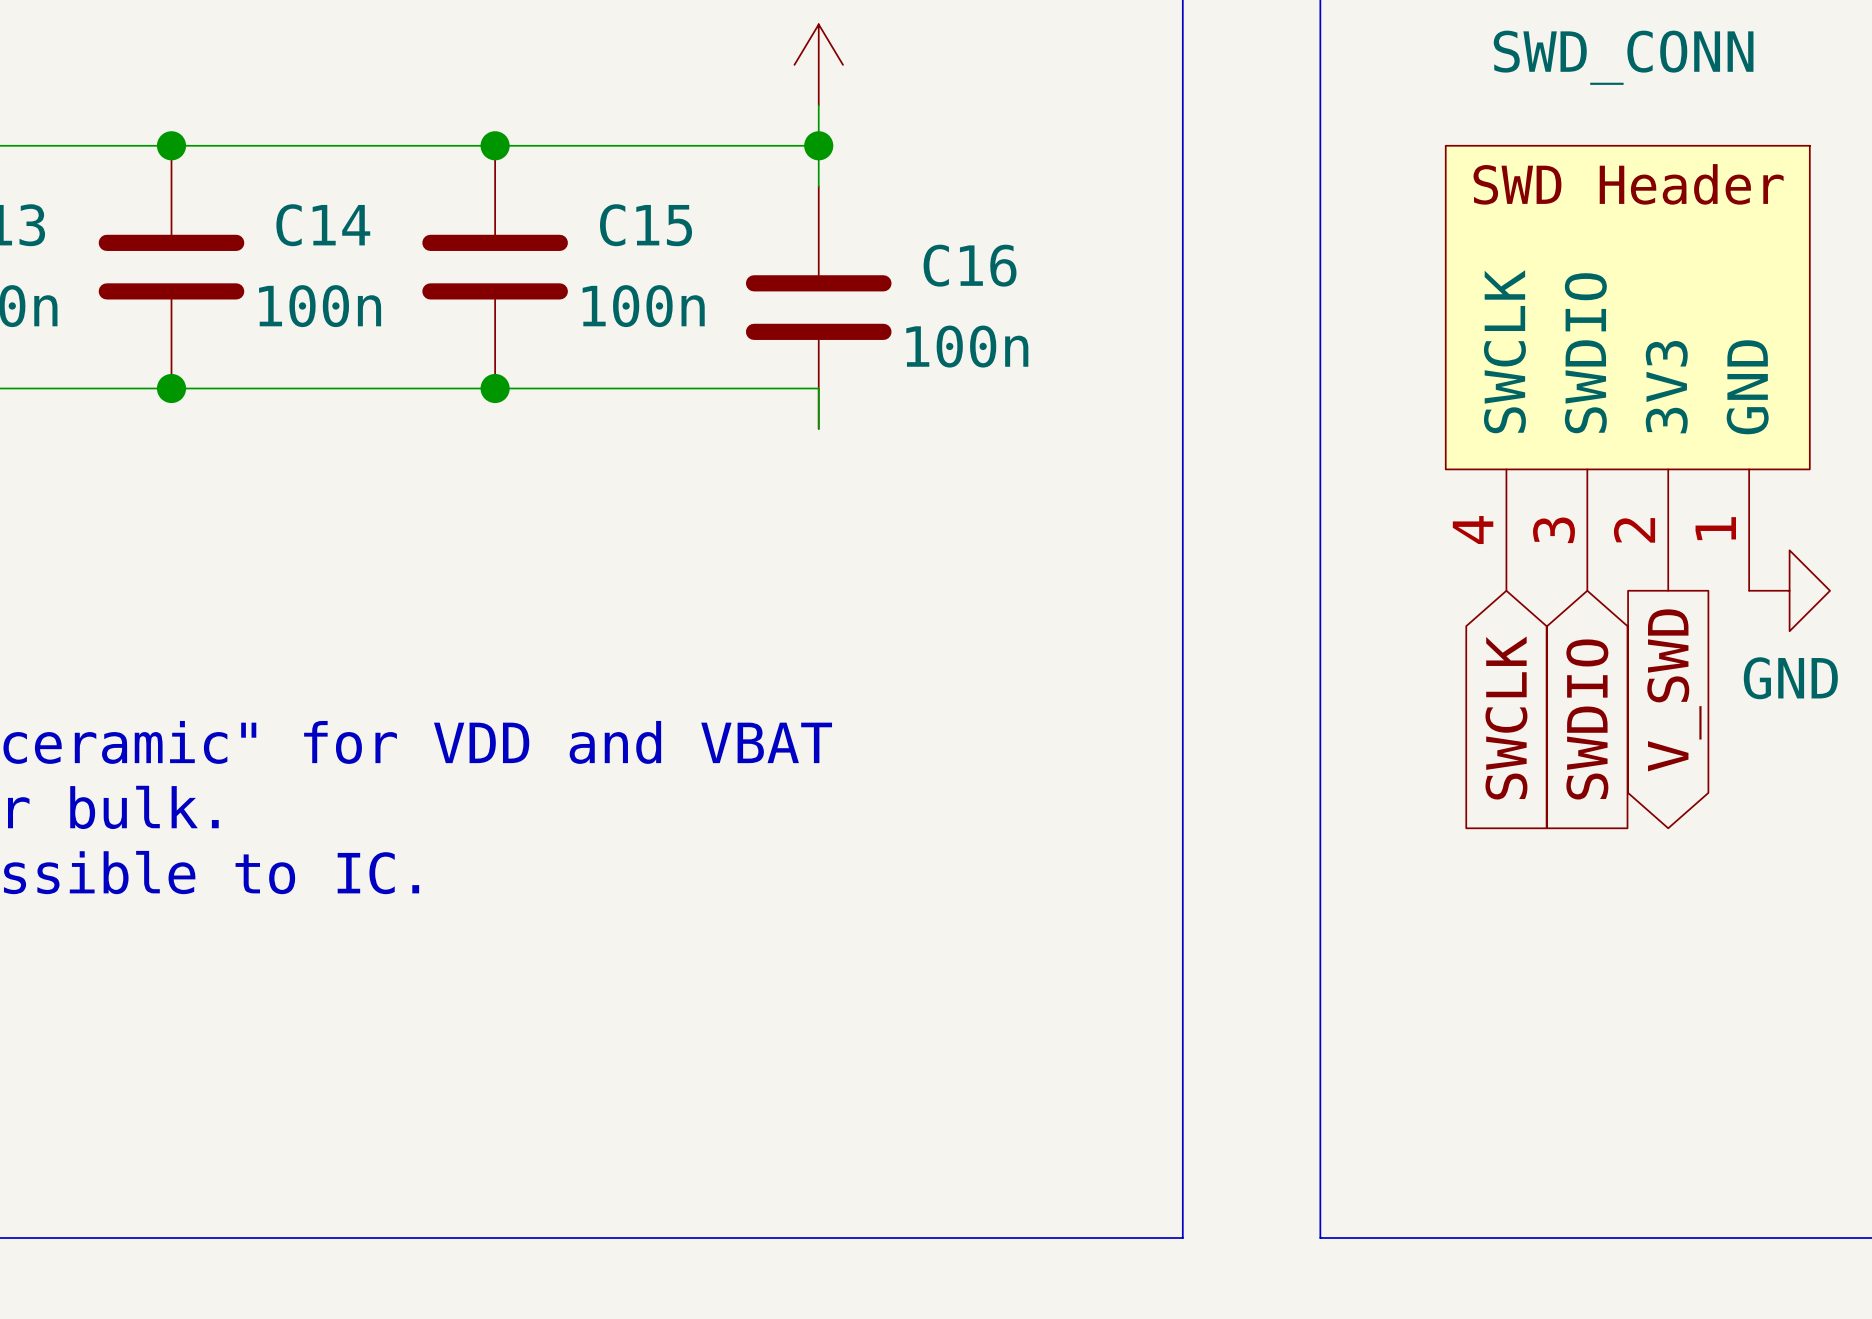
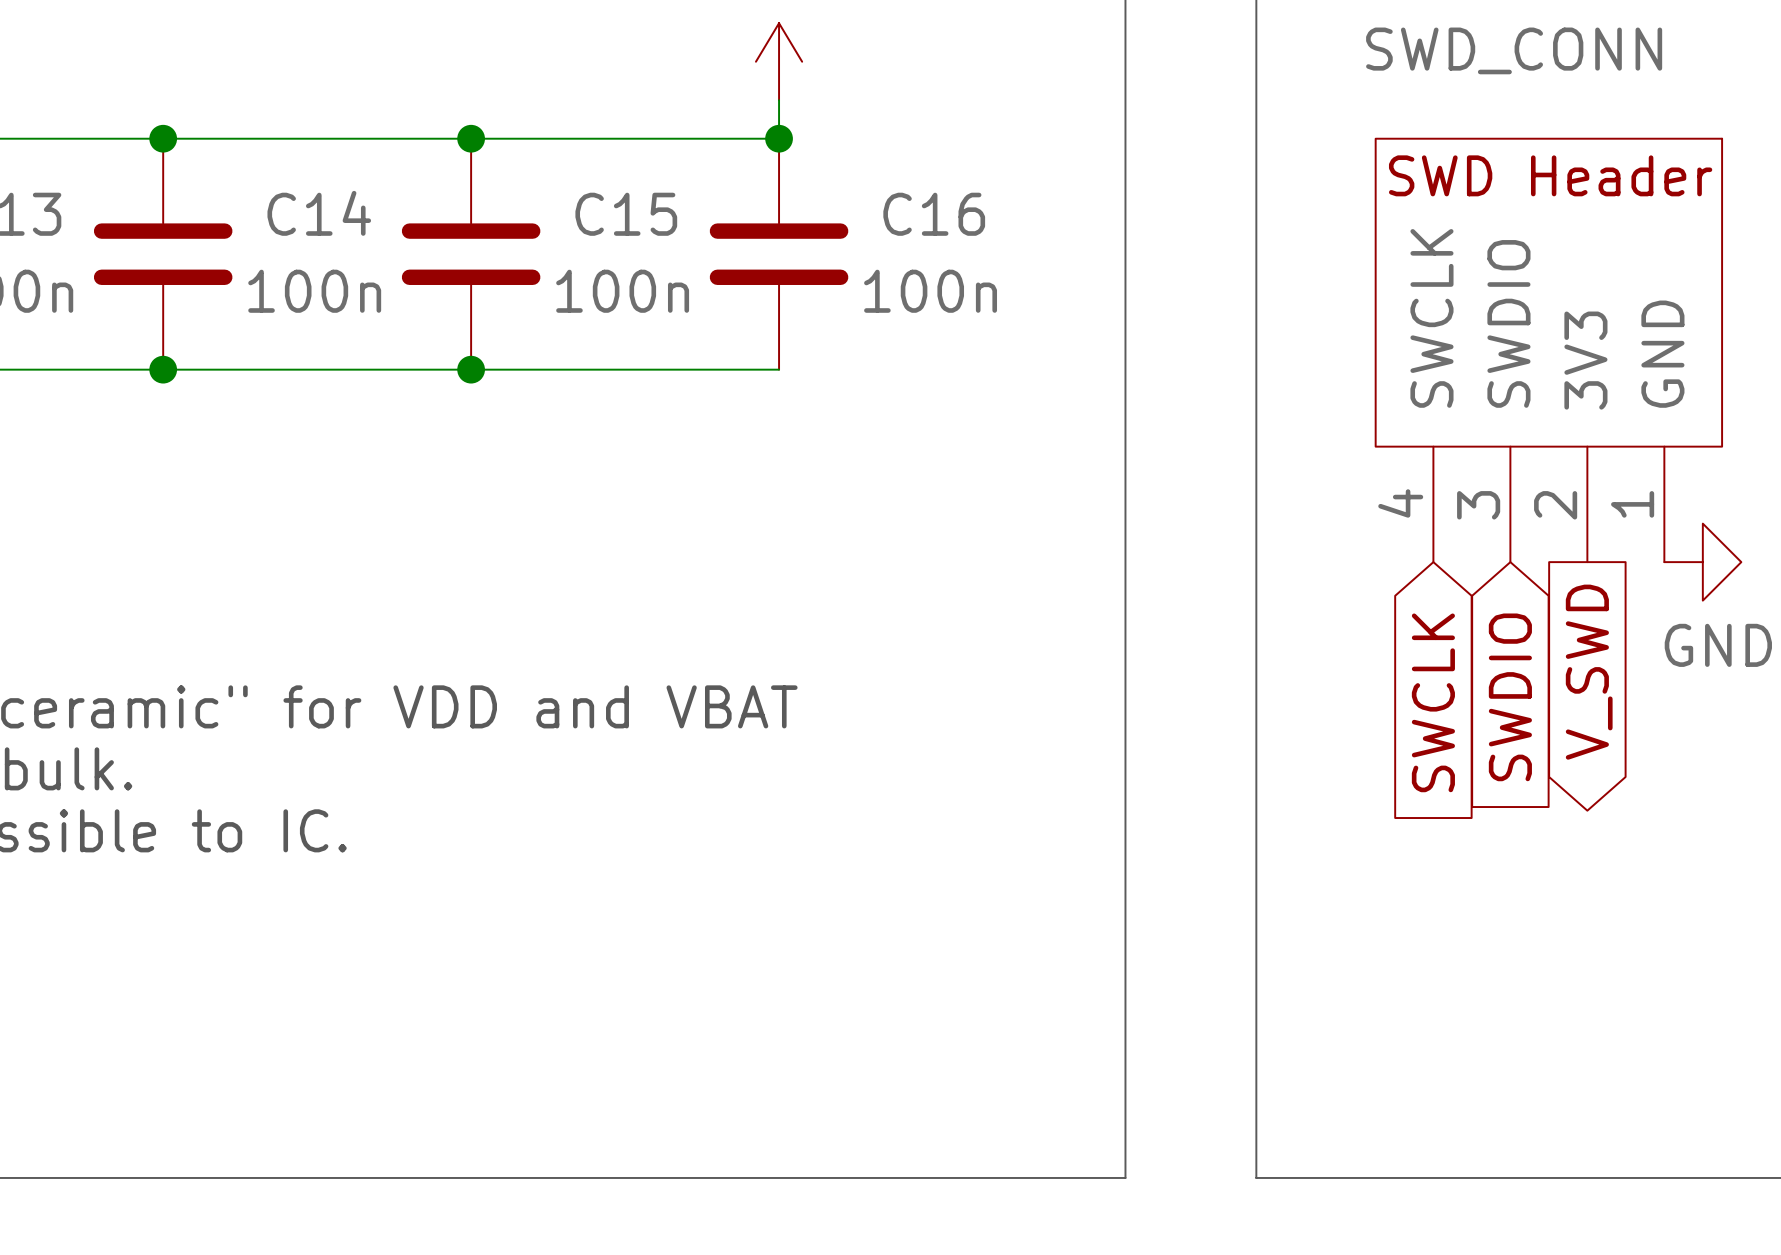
C16 position: (818, 307) -> (779, 254)
wire: (818, 388) (818, 428) -> none

